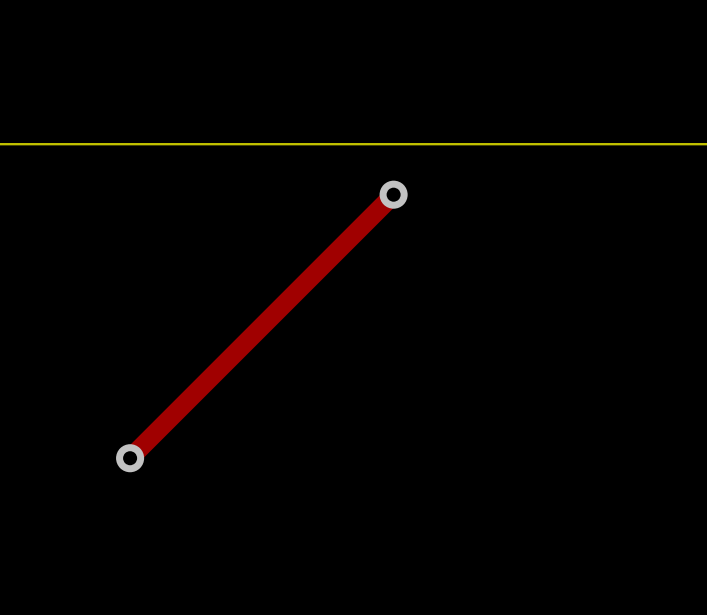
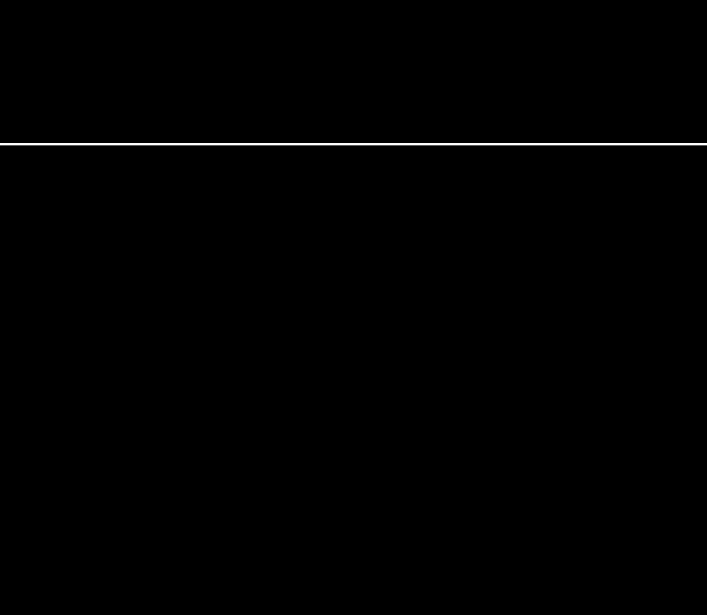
track: (393, 194) (130, 458) -> none
via: (393, 194) -> none
via: (130, 458) -> none

